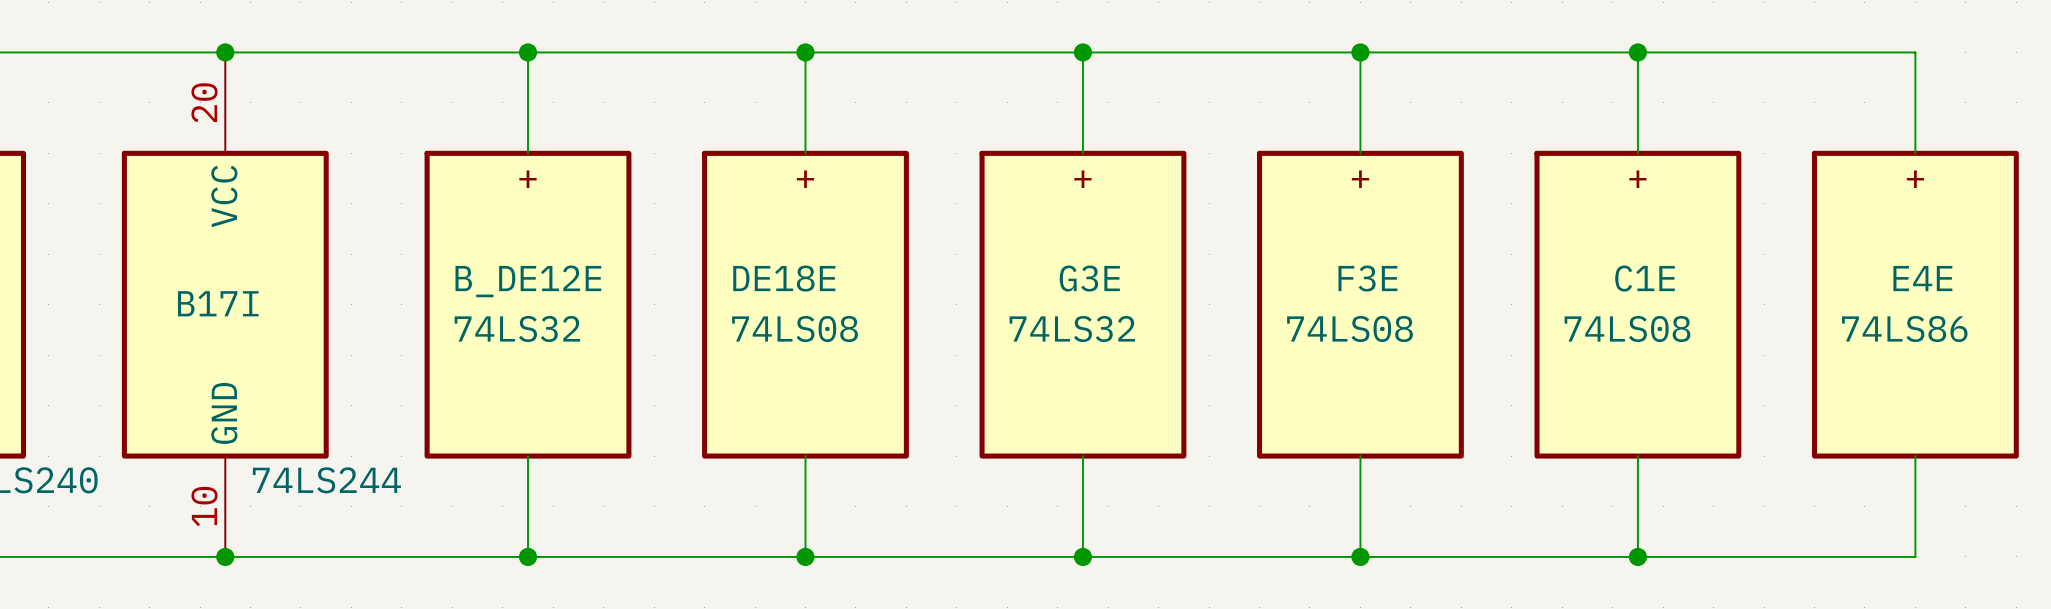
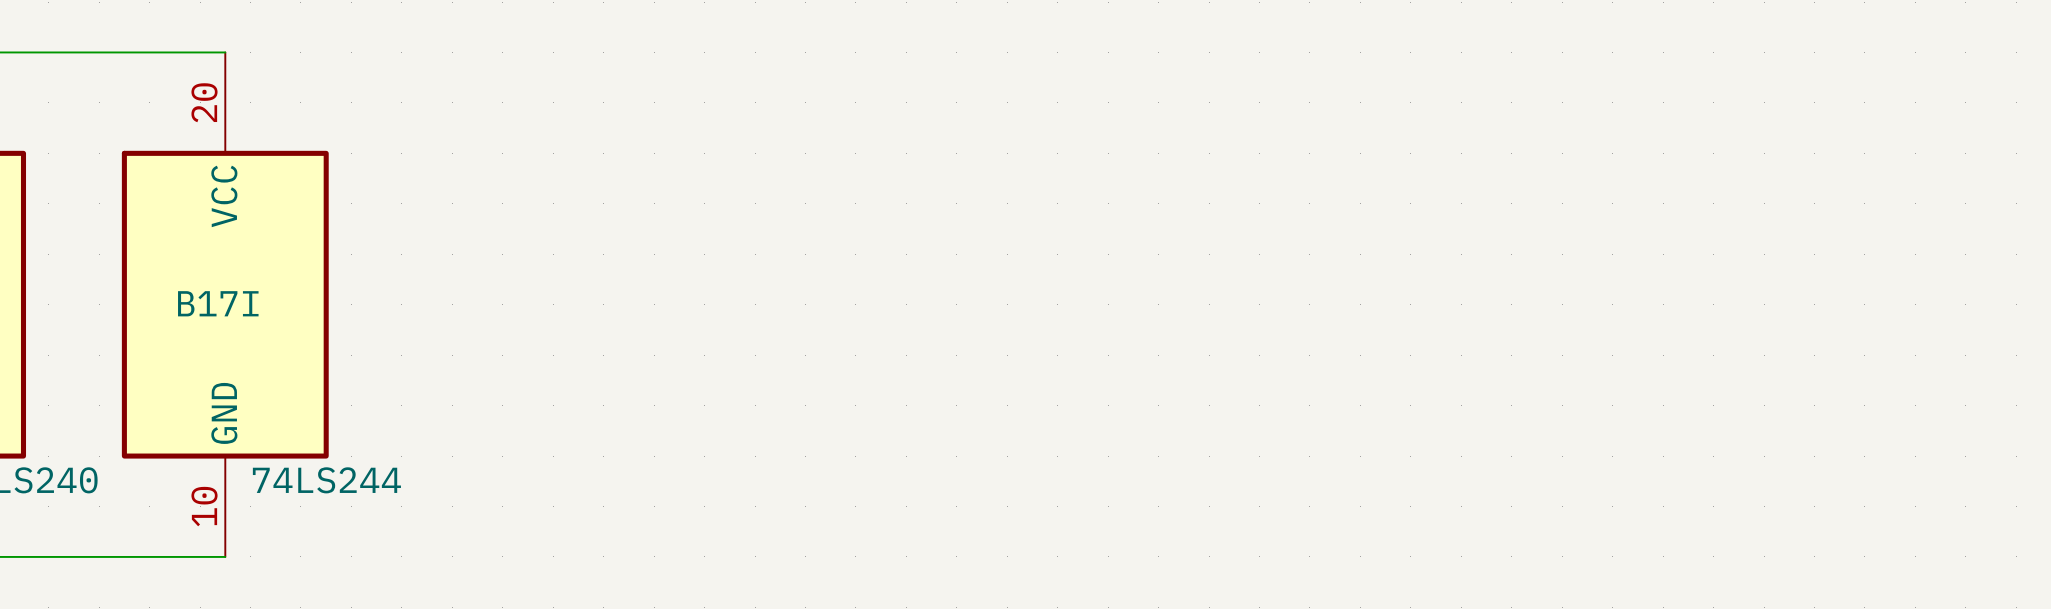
wire: (225, 52) (1915, 52) (1915, 153) -> none
junction: (225, 52) -> none
wire: (528, 52) (528, 153) -> none
junction: (528, 52) -> none
wire: (805, 52) (805, 153) -> none
junction: (805, 52) -> none
wire: (1082, 52) (1082, 153) -> none
junction: (1082, 52) -> none
wire: (1360, 52) (1360, 153) -> none
junction: (1360, 52) -> none
wire: (1637, 52) (1637, 153) -> none
junction: (1637, 52) -> none
B_DE12E: 74LS32 (528, 304) -> none
DE18E: 74LS08 (805, 304) -> none
G3E: 74LS32 (1082, 304) -> none
F3E: 74LS08 (1360, 304) -> none
C1E: 74LS08 (1637, 304) -> none
E4E: 74LS86 (1915, 304) -> none
wire: (528, 456) (528, 556) -> none
wire: (805, 456) (805, 556) -> none
wire: (1082, 456) (1082, 556) -> none
wire: (1360, 456) (1360, 556) -> none
wire: (1637, 456) (1637, 556) -> none
wire: (1915, 456) (1915, 556) (225, 556) -> none
junction: (225, 556) -> none
junction: (528, 556) -> none
junction: (805, 556) -> none
junction: (1082, 556) -> none
junction: (1360, 556) -> none
junction: (1637, 556) -> none

